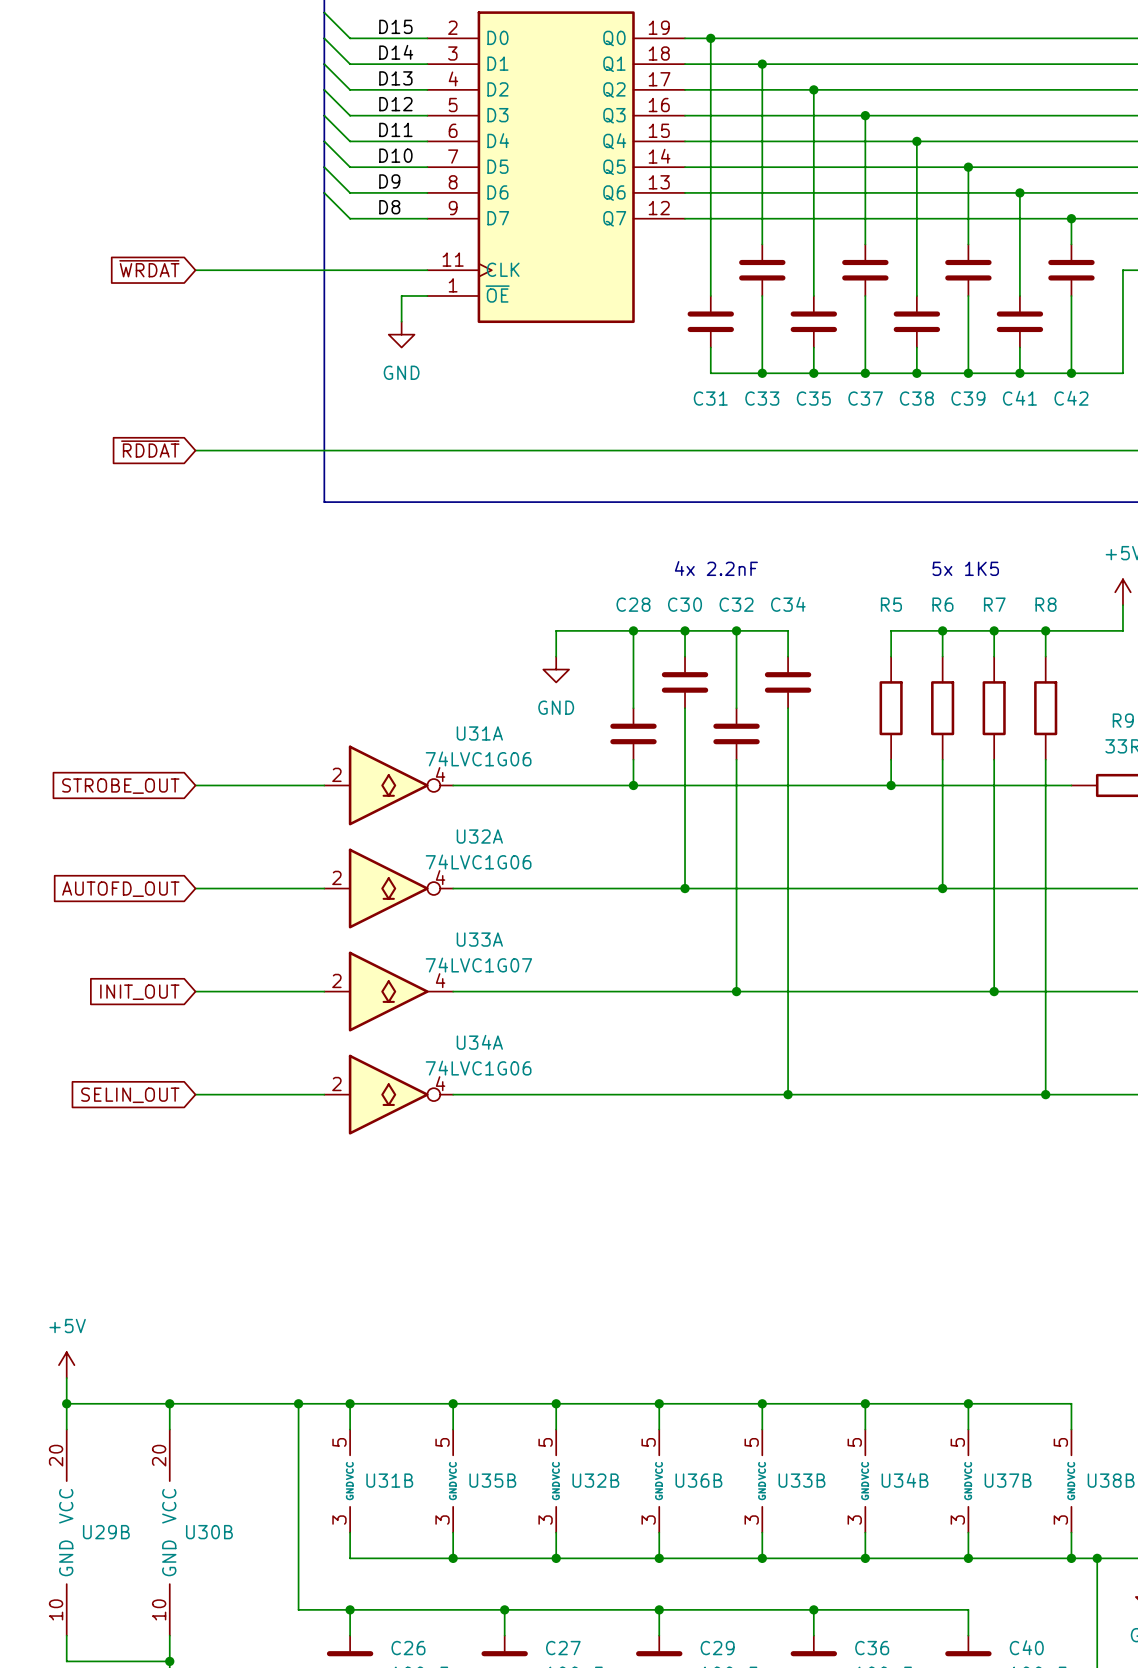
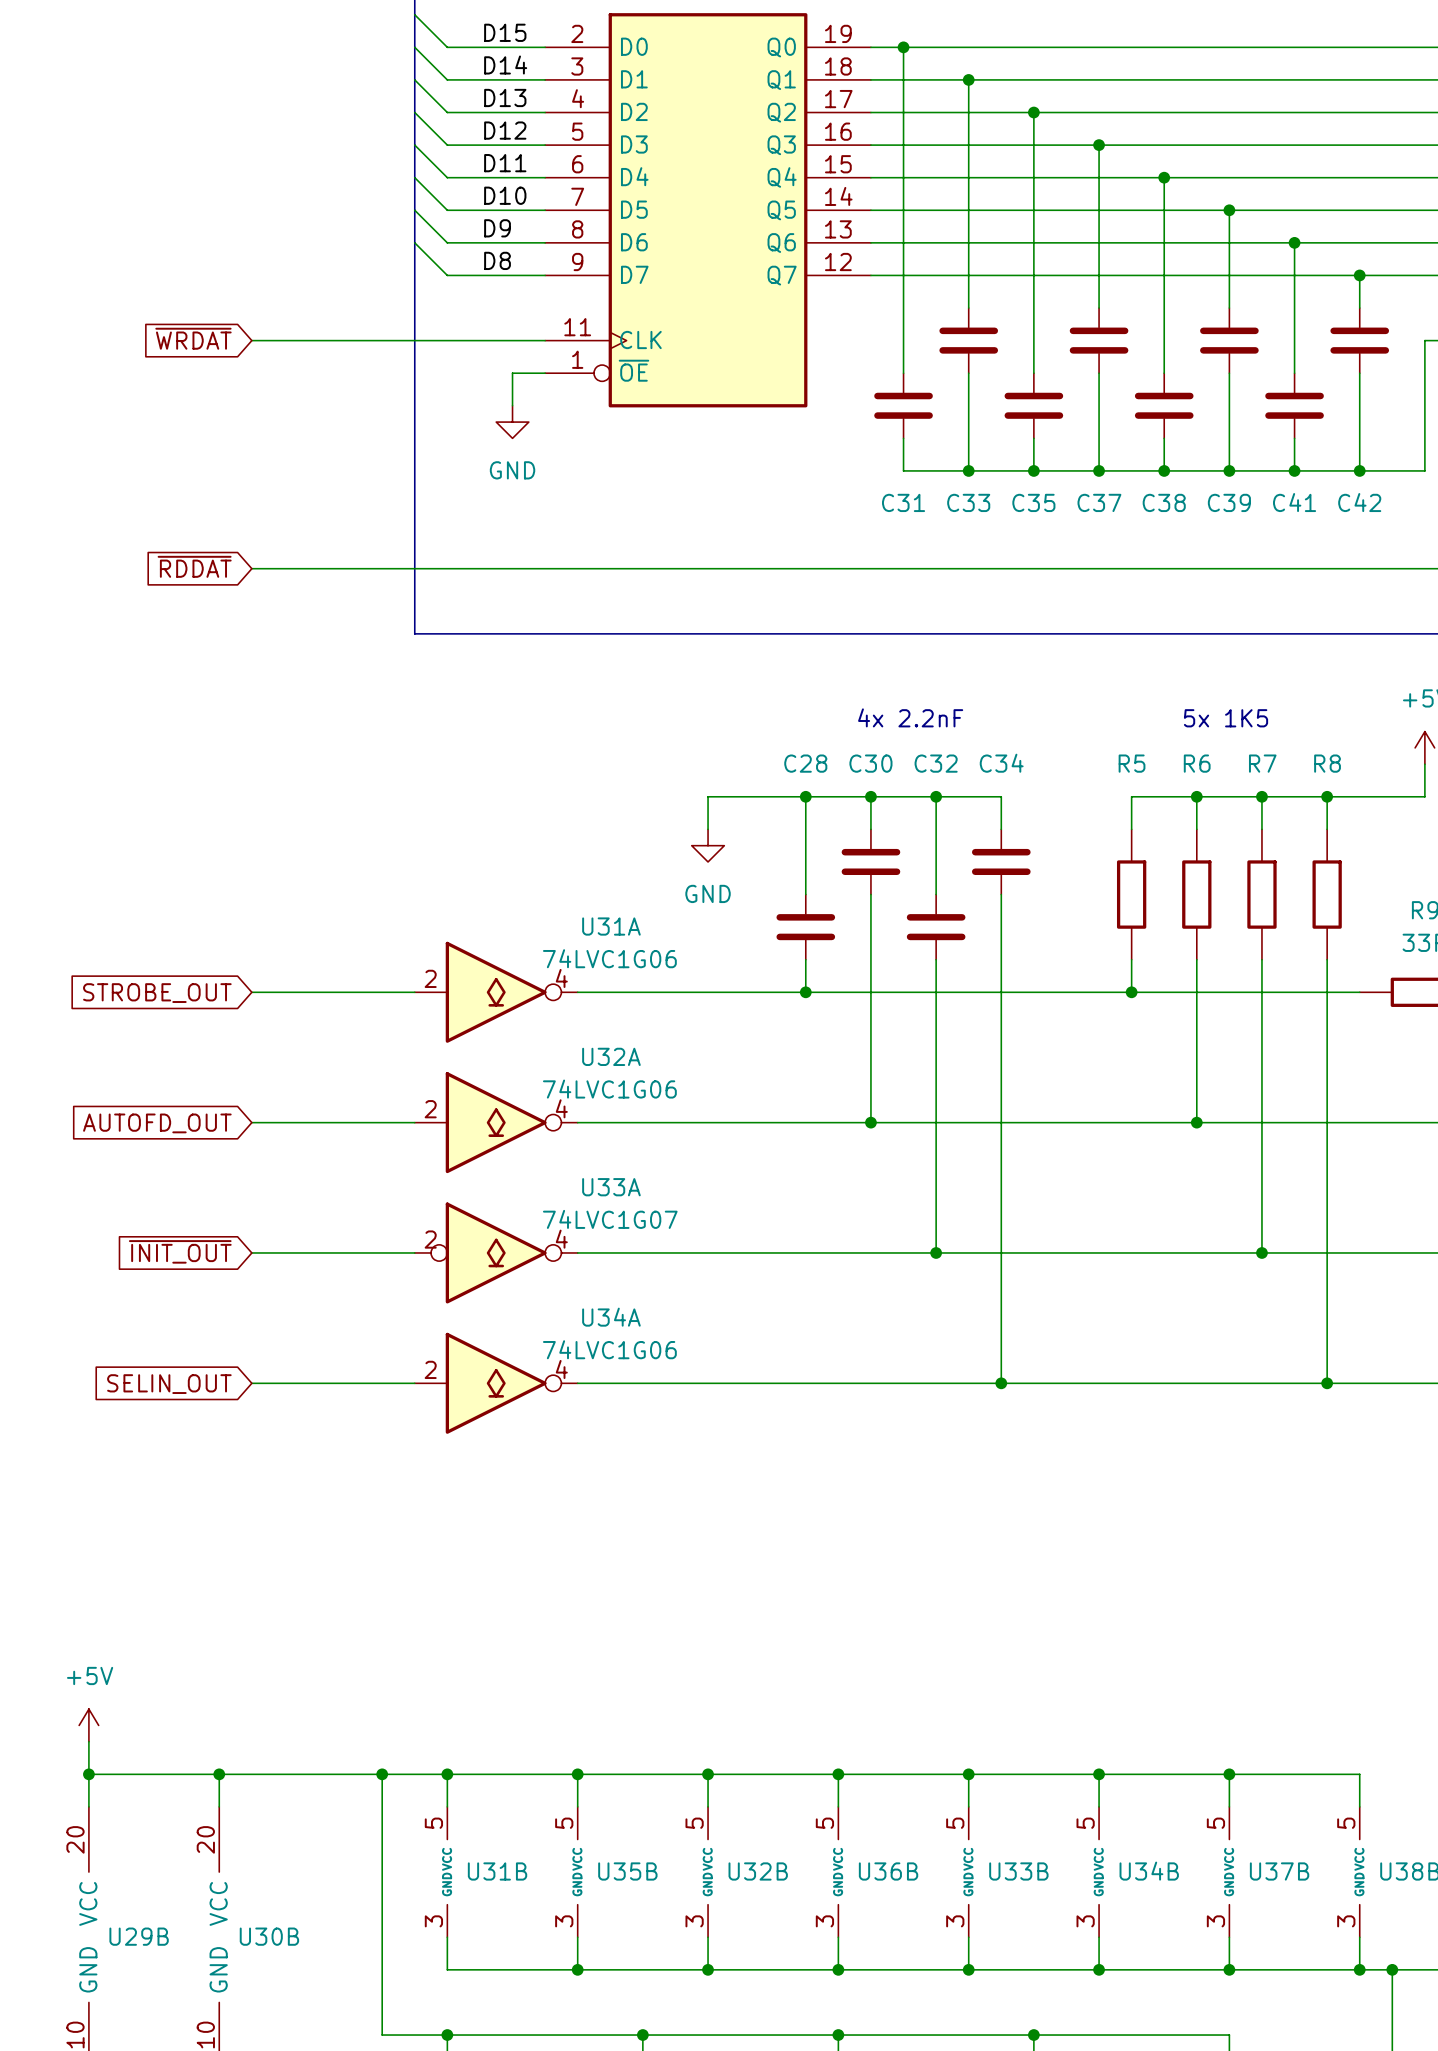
part symbol: [427, 11, 686, 324] -> [545, 13, 871, 408]
U33A symbol: [324, 951, 454, 1032] -> [414, 1202, 578, 1304]
global label: INIT_OUT (139, 992) -> ~{INIT_OUT} (180, 1251)

